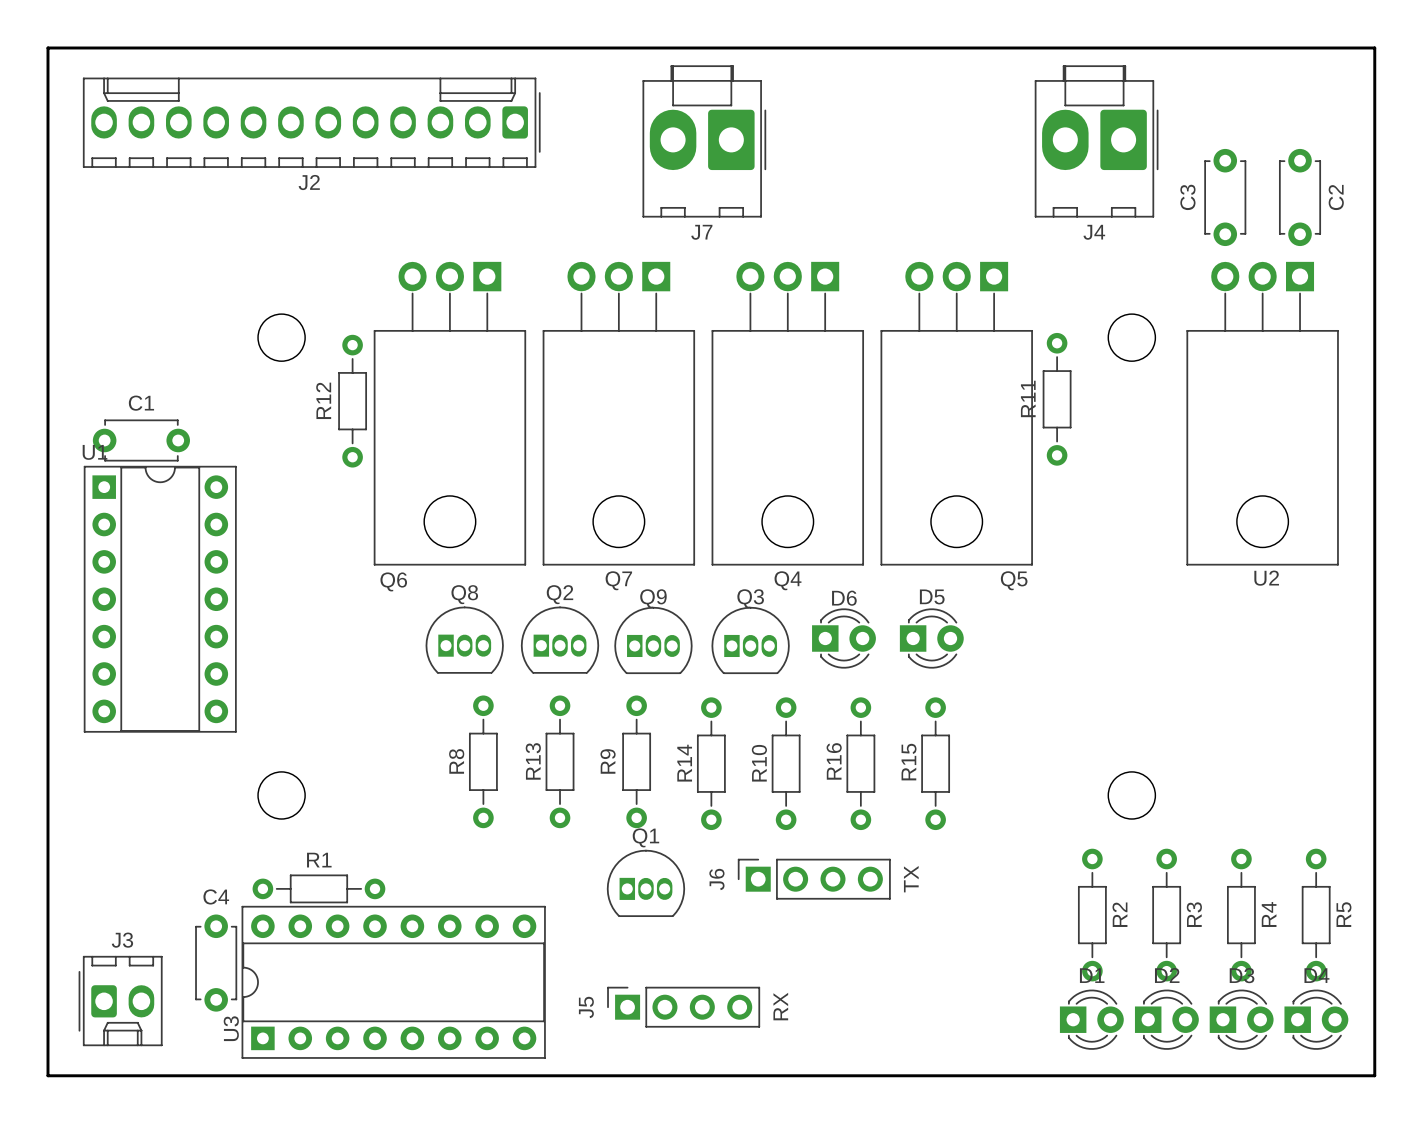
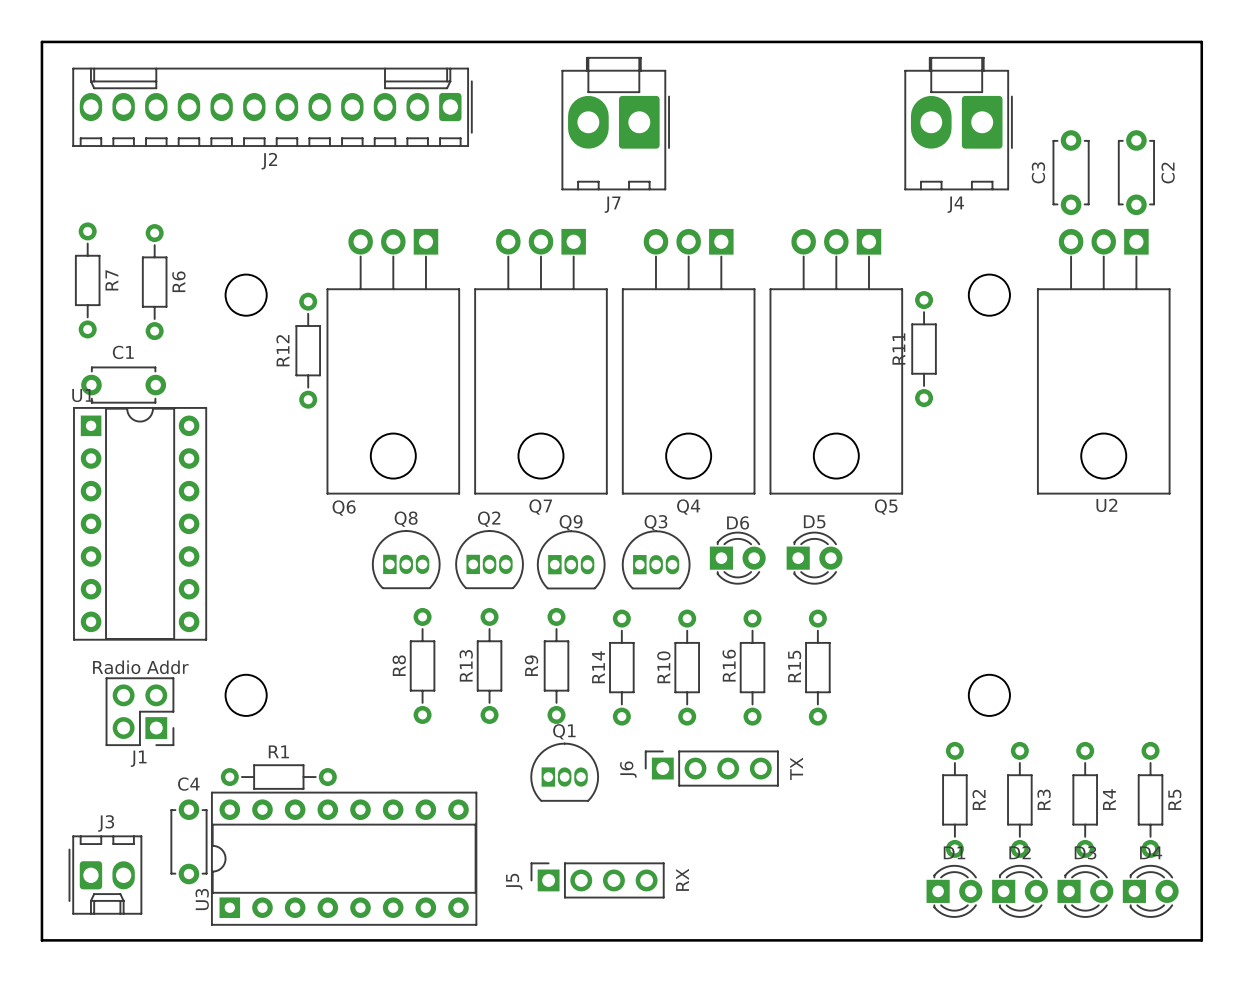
R7: none -> (87, 280)
R6: none -> (154, 282)
J1: none -> (139, 711)

